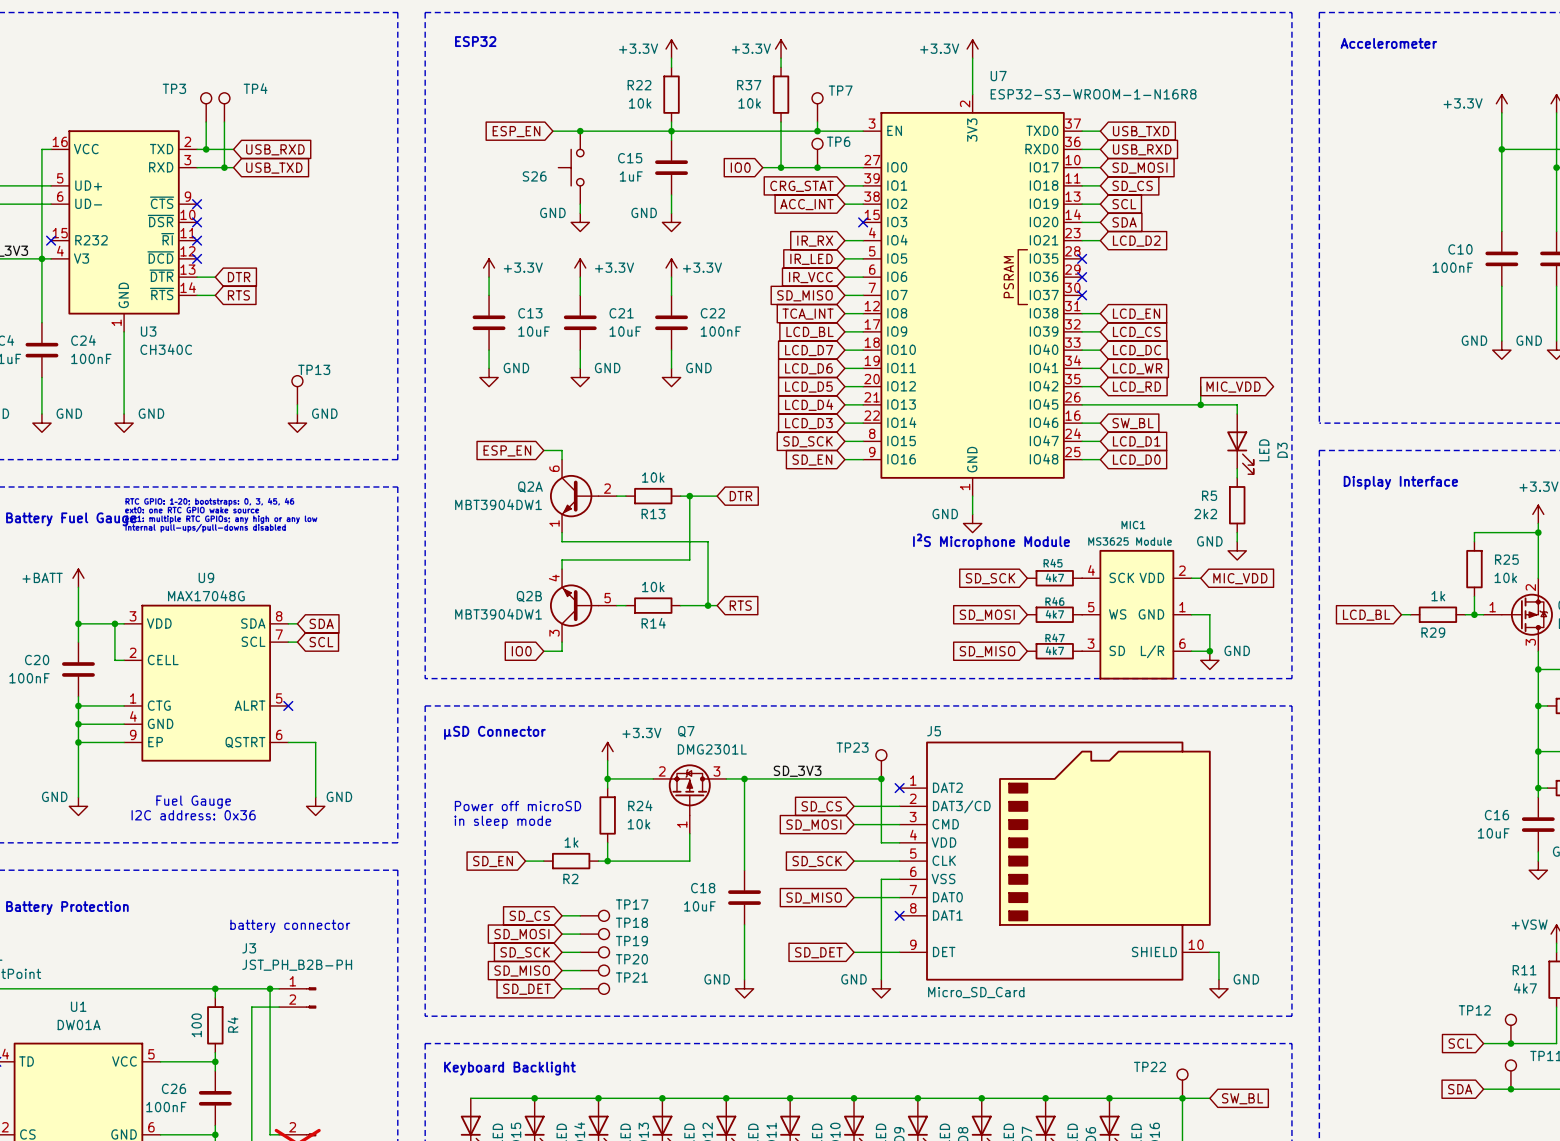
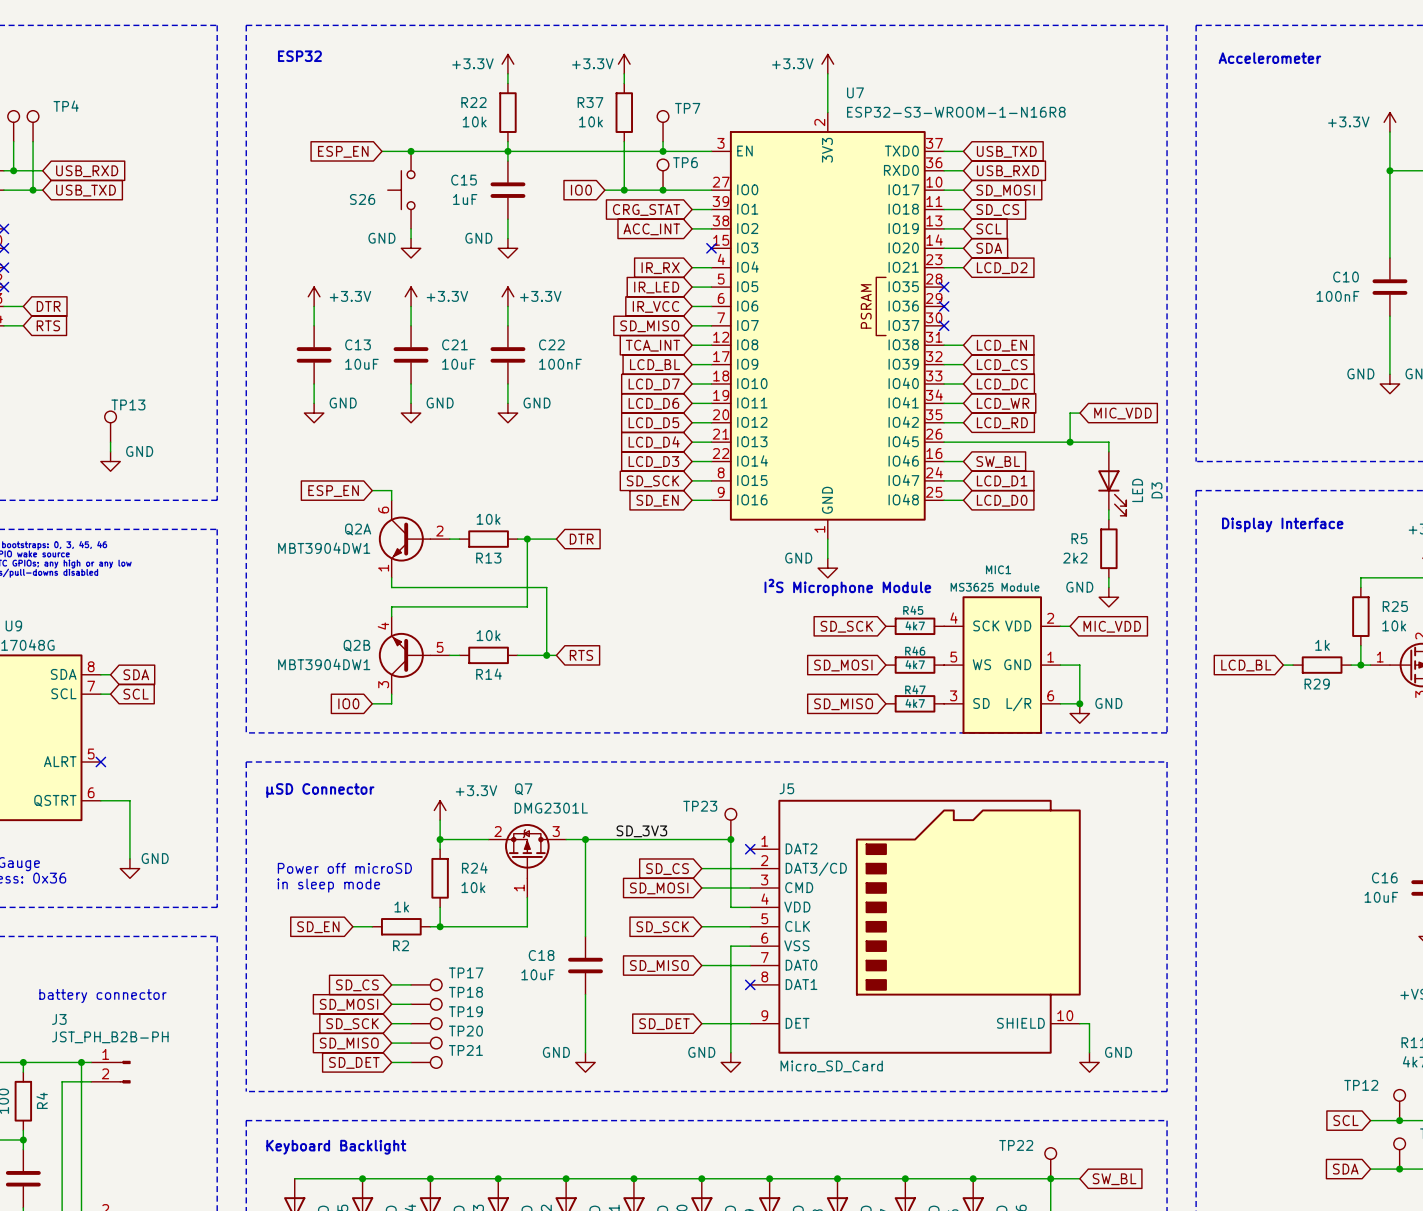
global label rotation: 0° (1233, 387) -> 180° (1122, 413)

